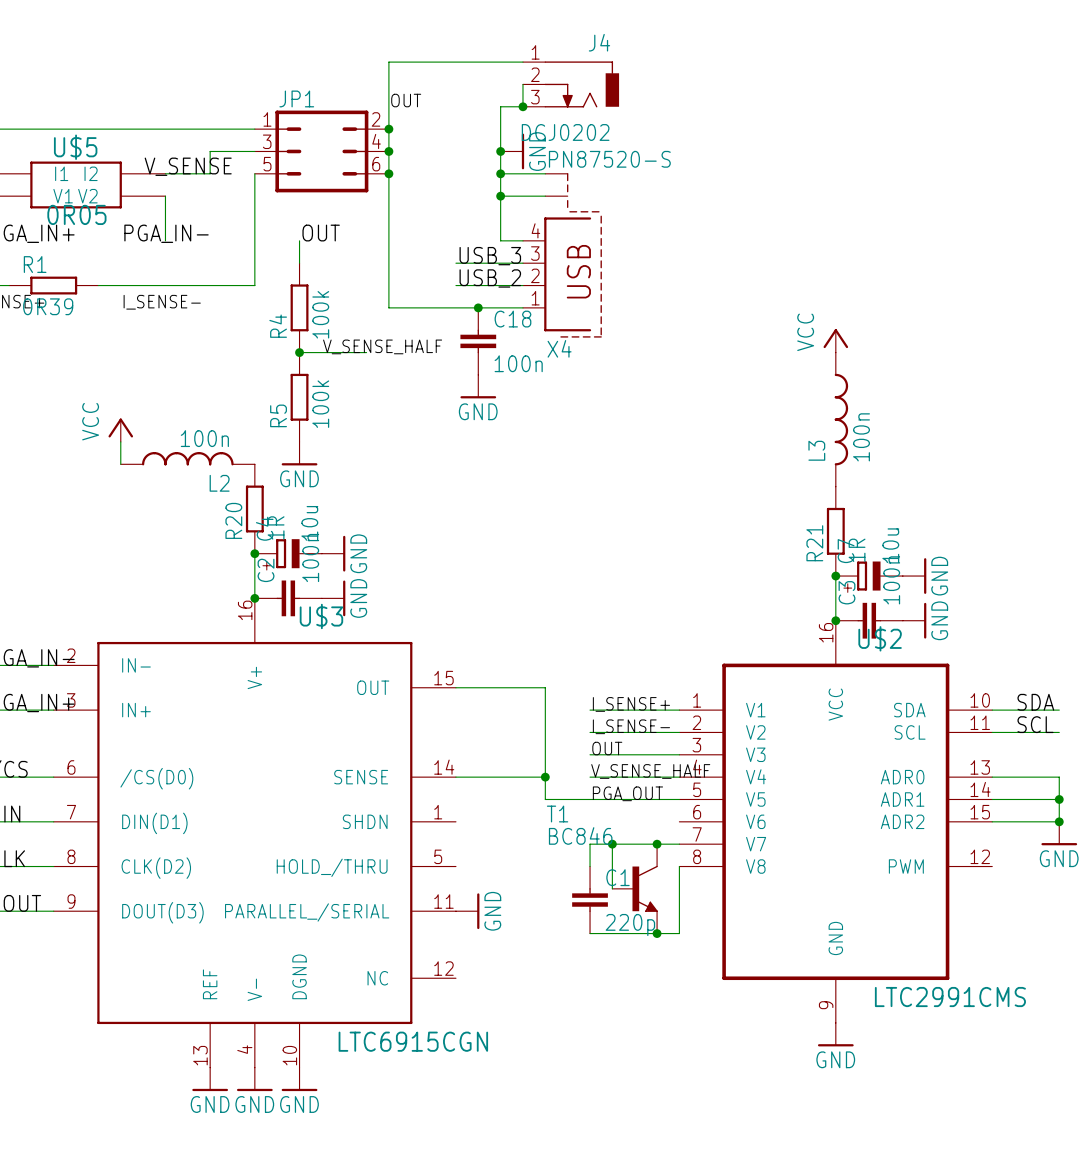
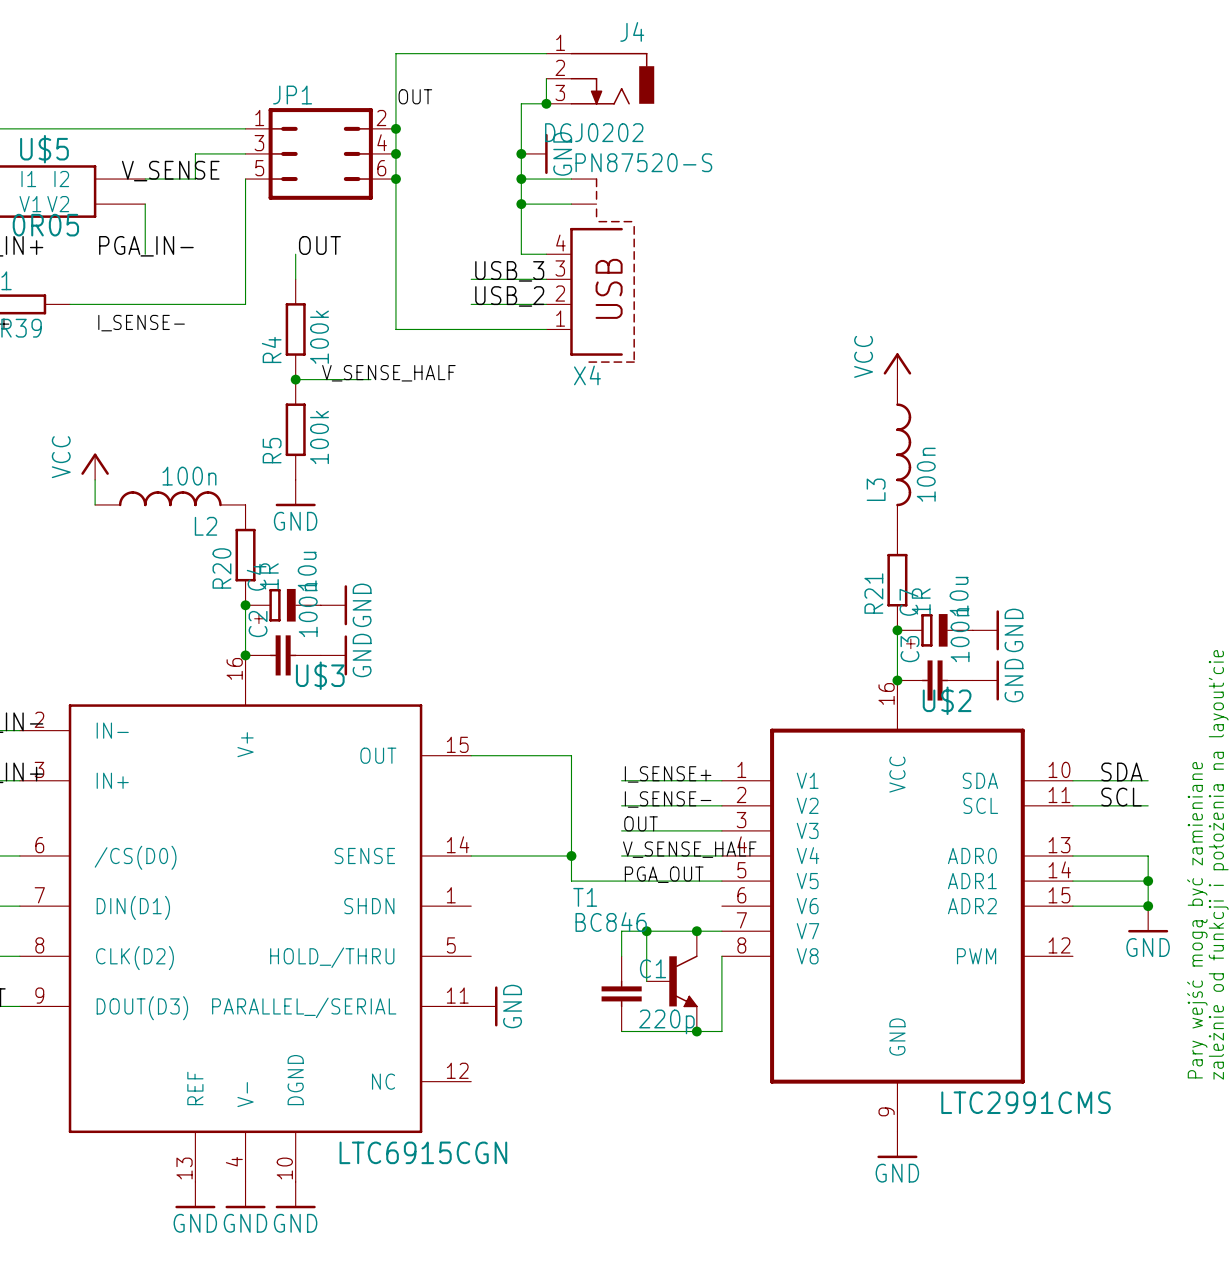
junction: (478, 307) -> none
C18: 100n (478, 341) -> none
power symbol: GND (478, 386) -> none

